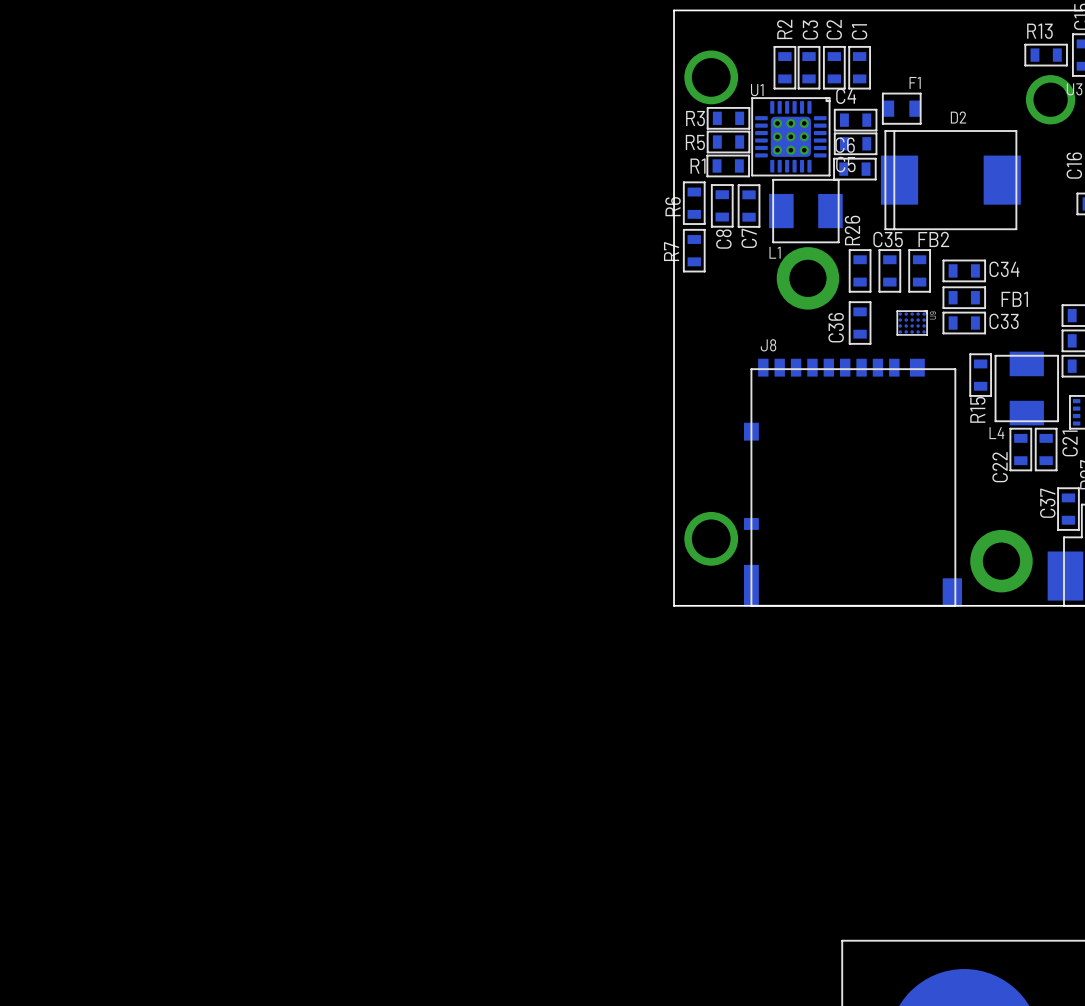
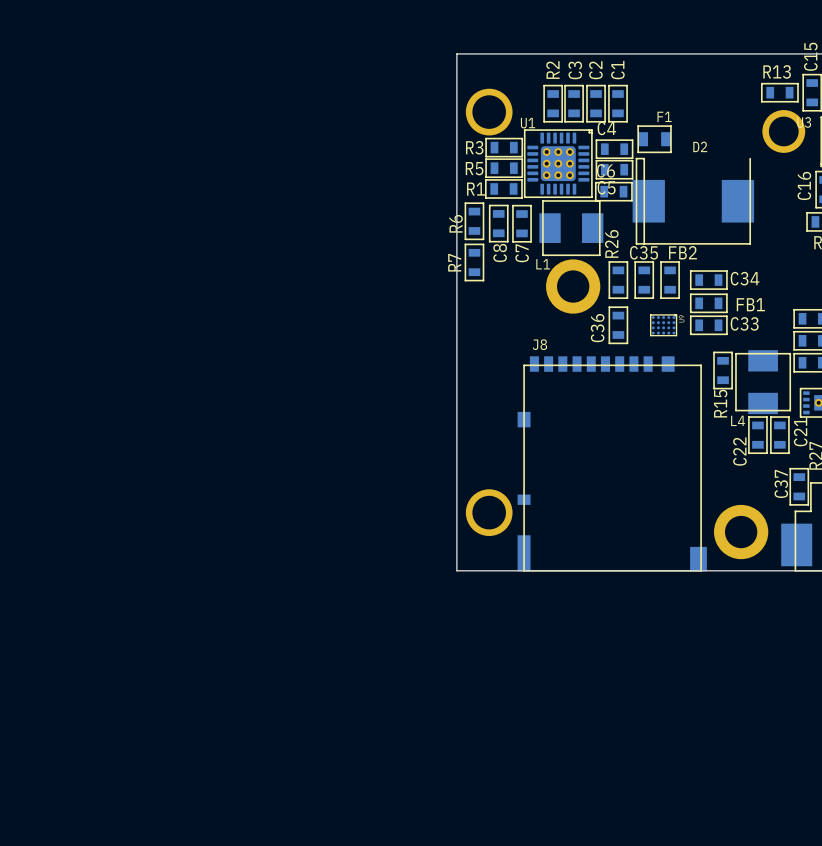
D2 footprint: [880, 130, 1021, 231] -> [632, 157, 755, 245]

